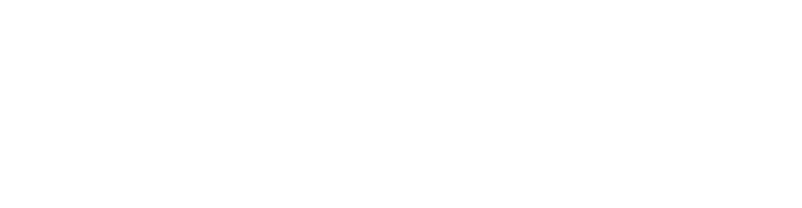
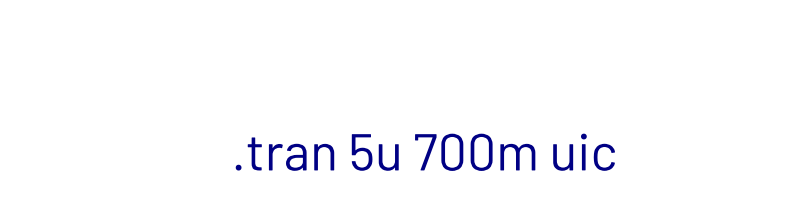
text: none -> .tran 5u 700m uic (425, 152)

